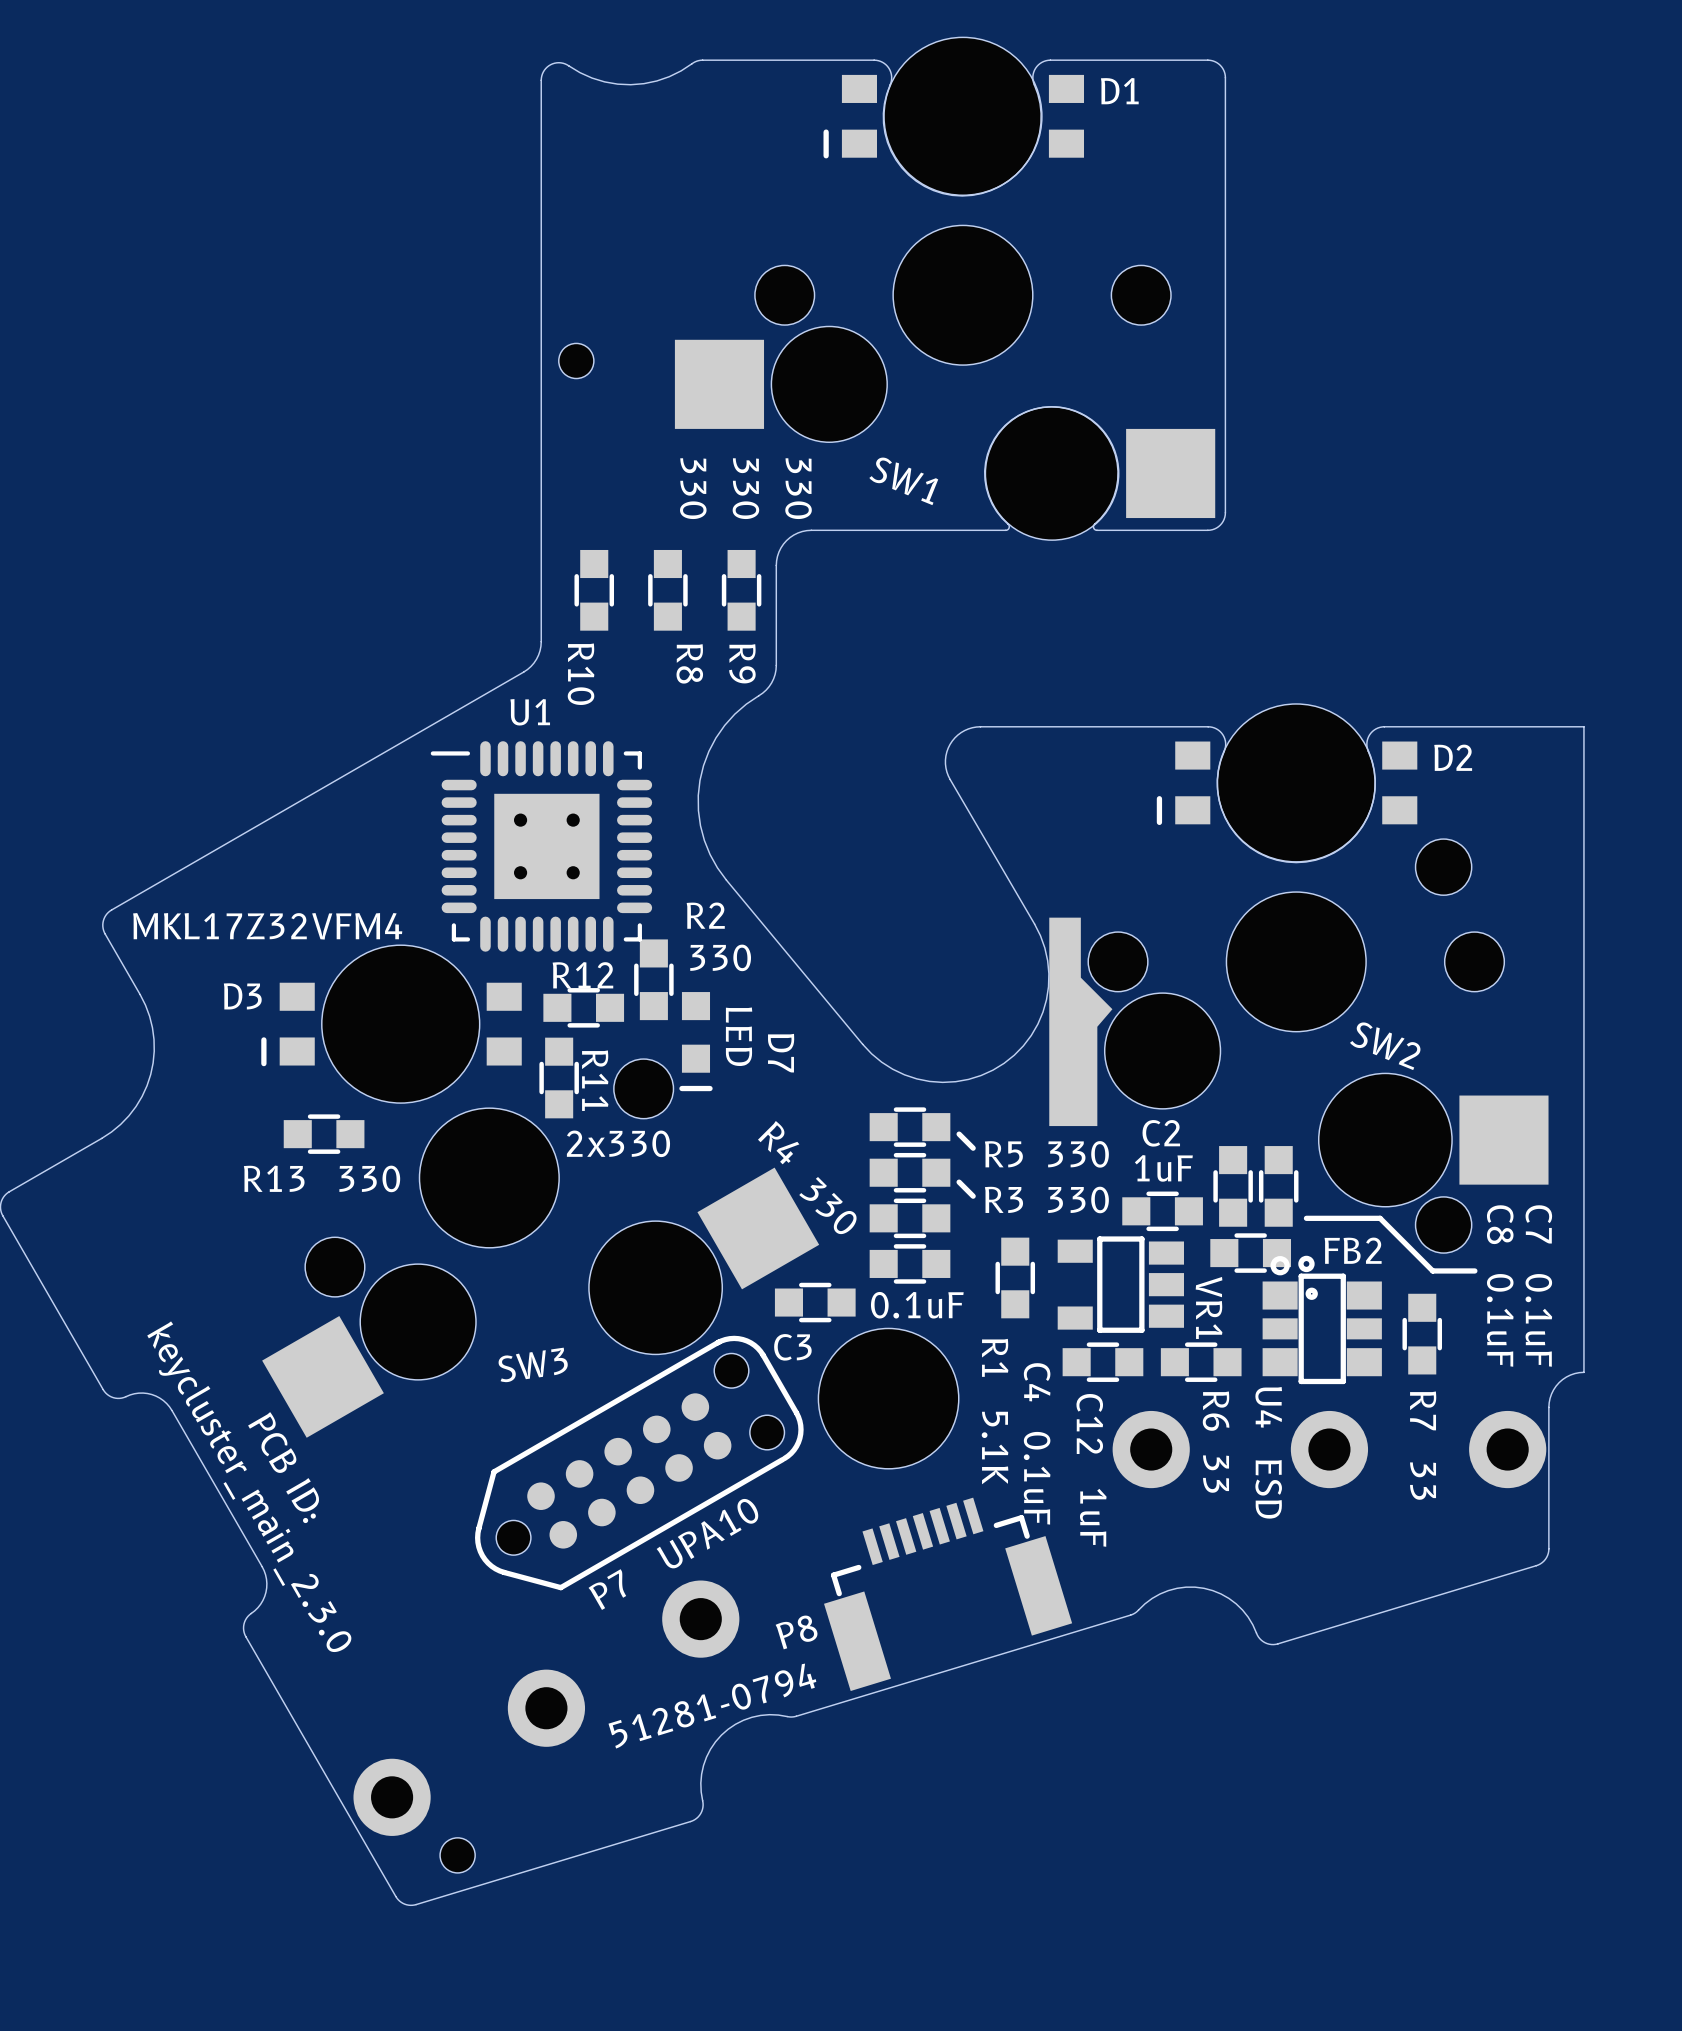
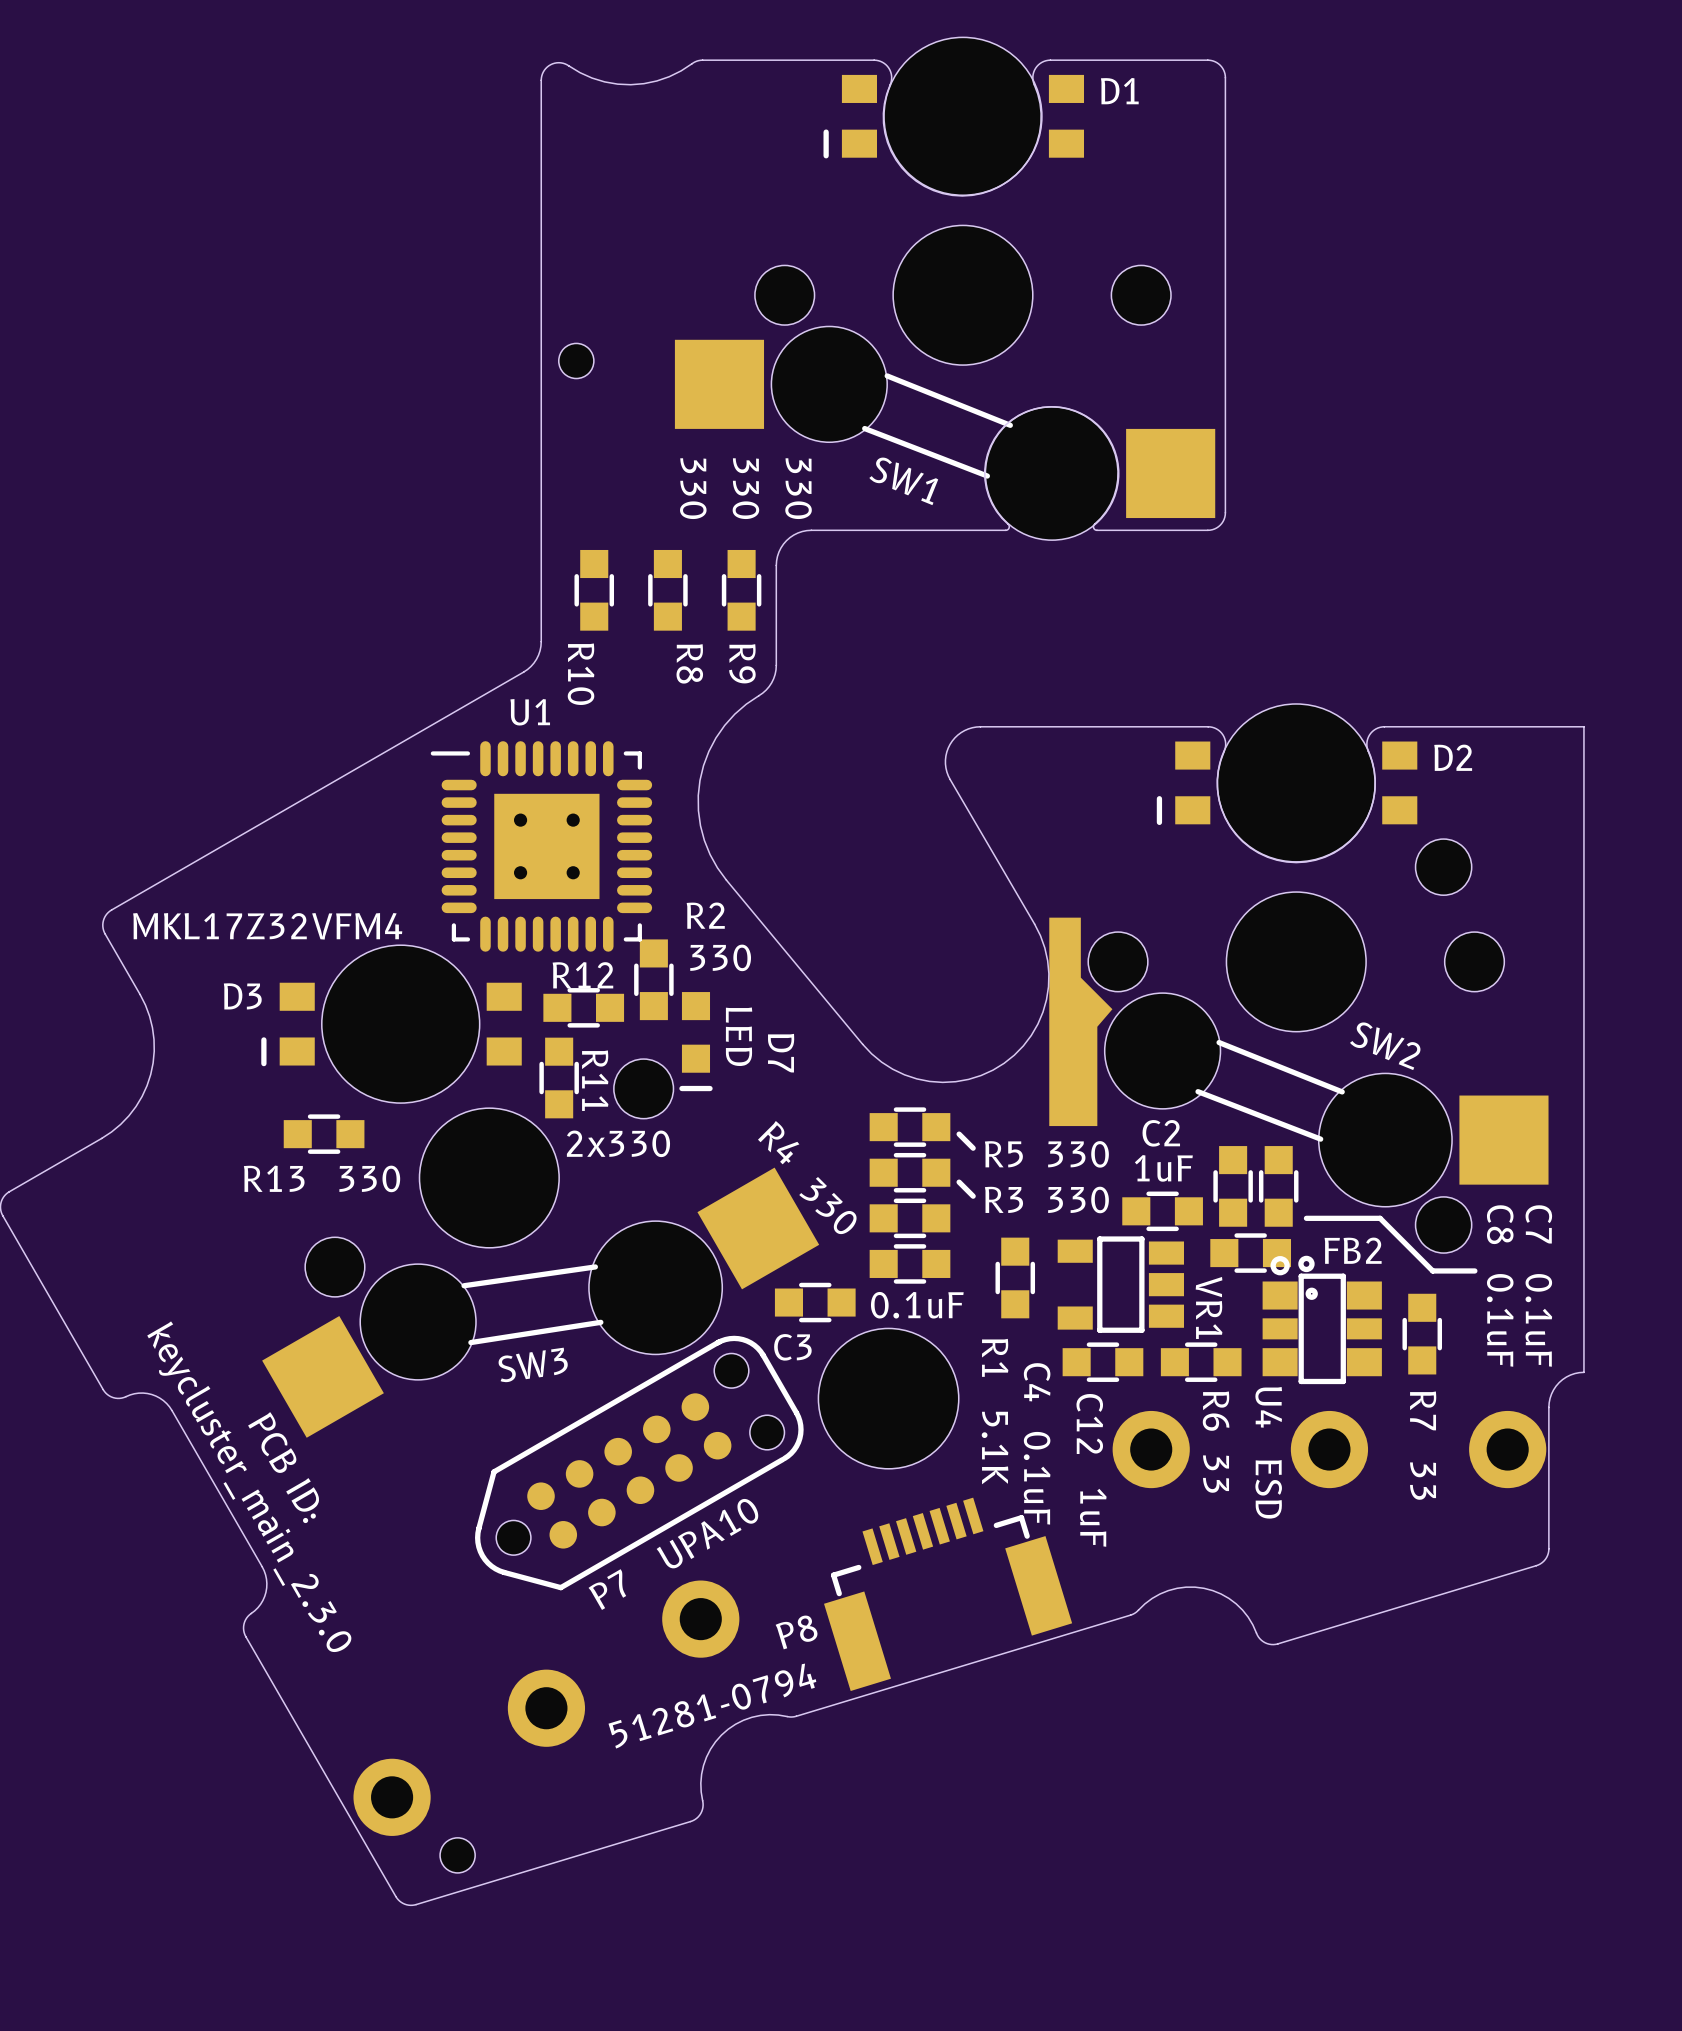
SW1 footprint: [674, 225, 1216, 541] -> [674, 225, 1216, 541]
SW2 footprint: [1049, 892, 1549, 1207] -> [1049, 892, 1549, 1207]
SW3 footprint: [262, 1059, 820, 1438] -> [262, 1059, 820, 1438]

